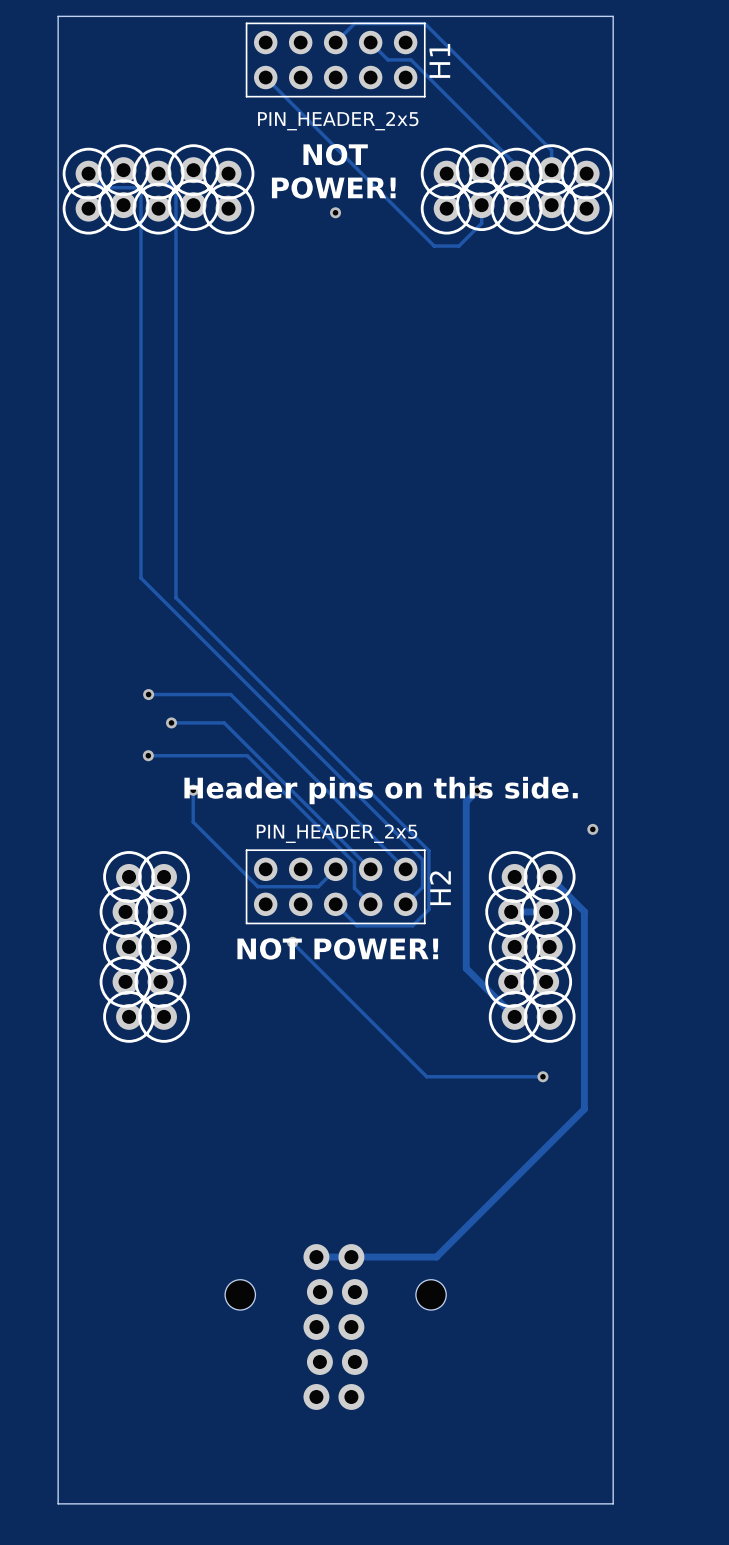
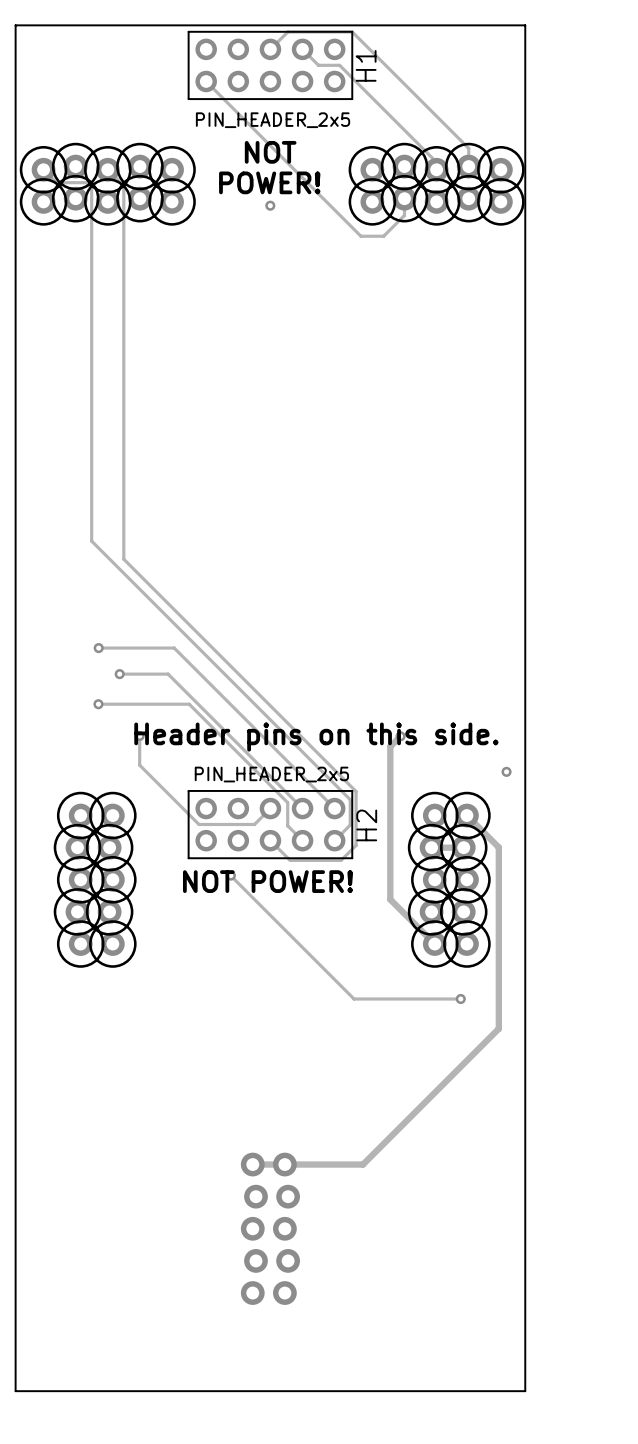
part: (240, 1294) -> none
part: (431, 1294) -> none

